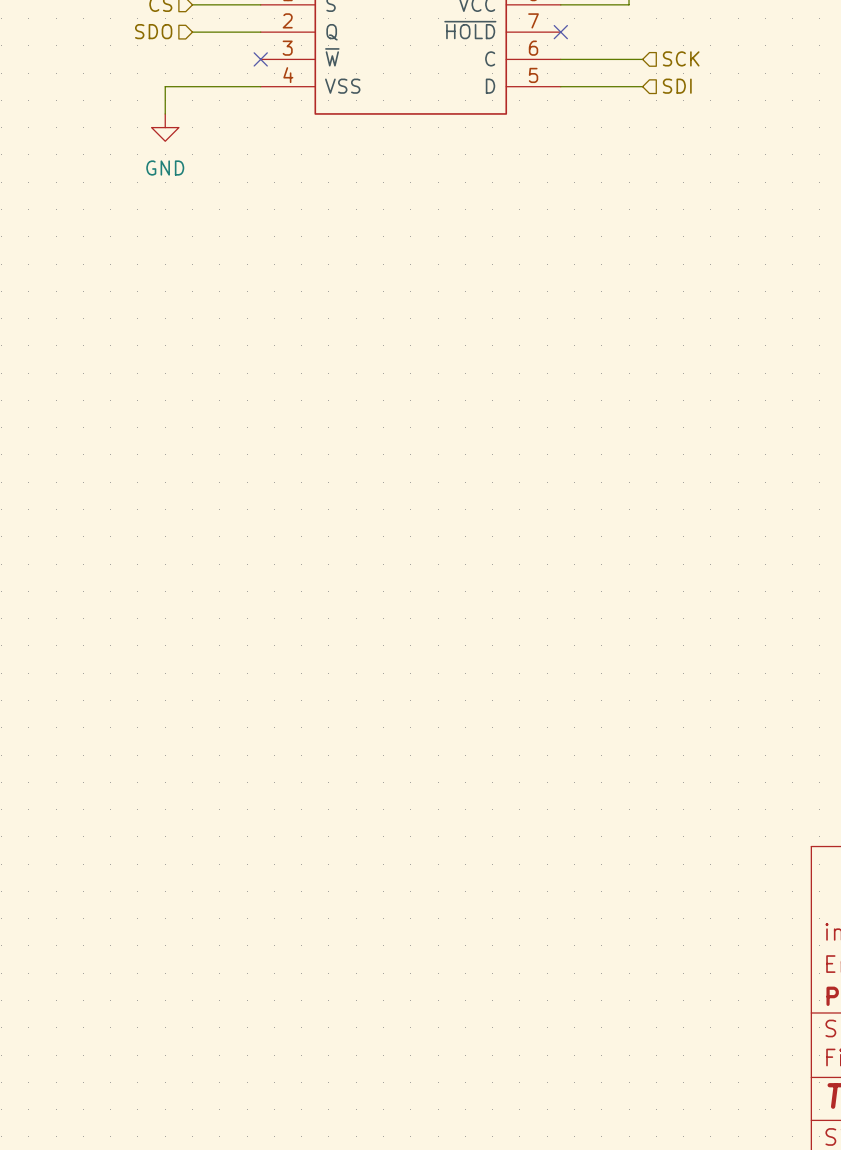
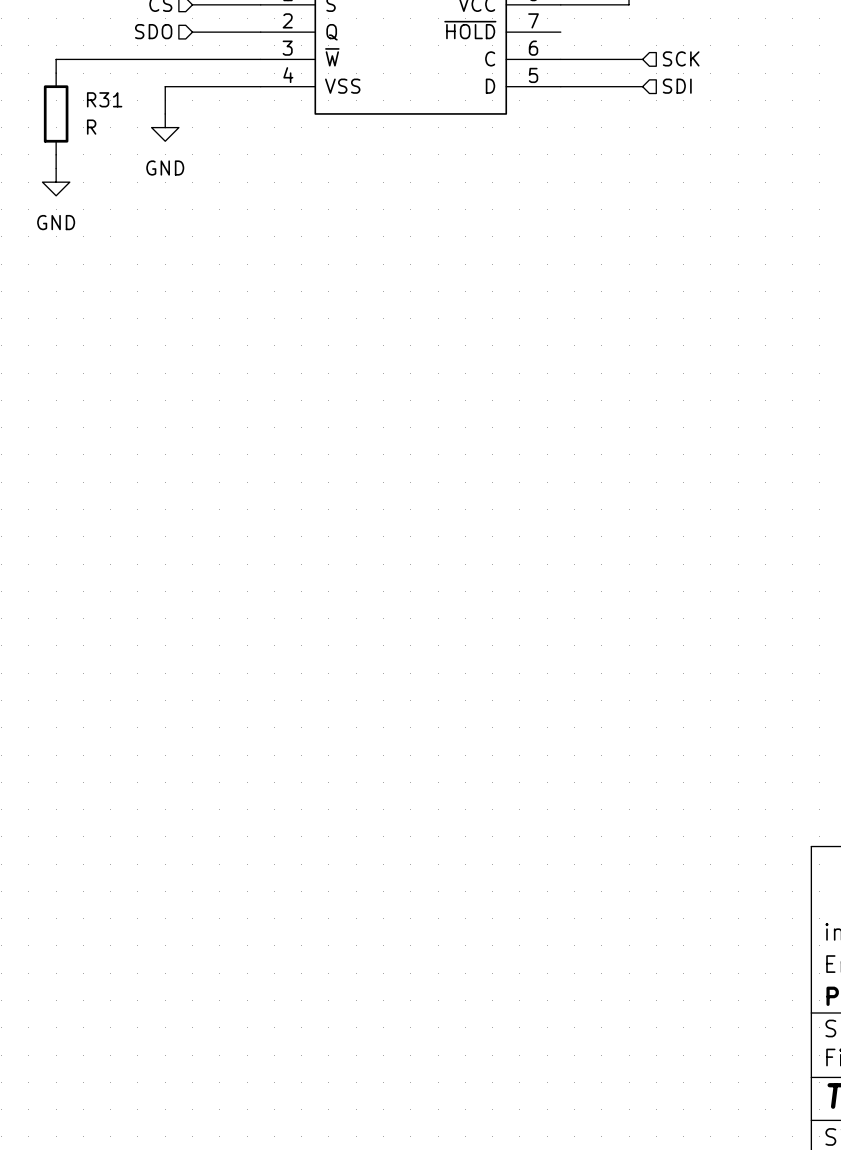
no-connect mark: (560, 32) -> none
wire: none -> (260, 59) (56, 59) (56, 73)
no-connect mark: (260, 59) -> none
R31: none -> R (56, 113)
wire: none -> (56, 154) (56, 168)
power symbol: none -> GND (56, 182)

